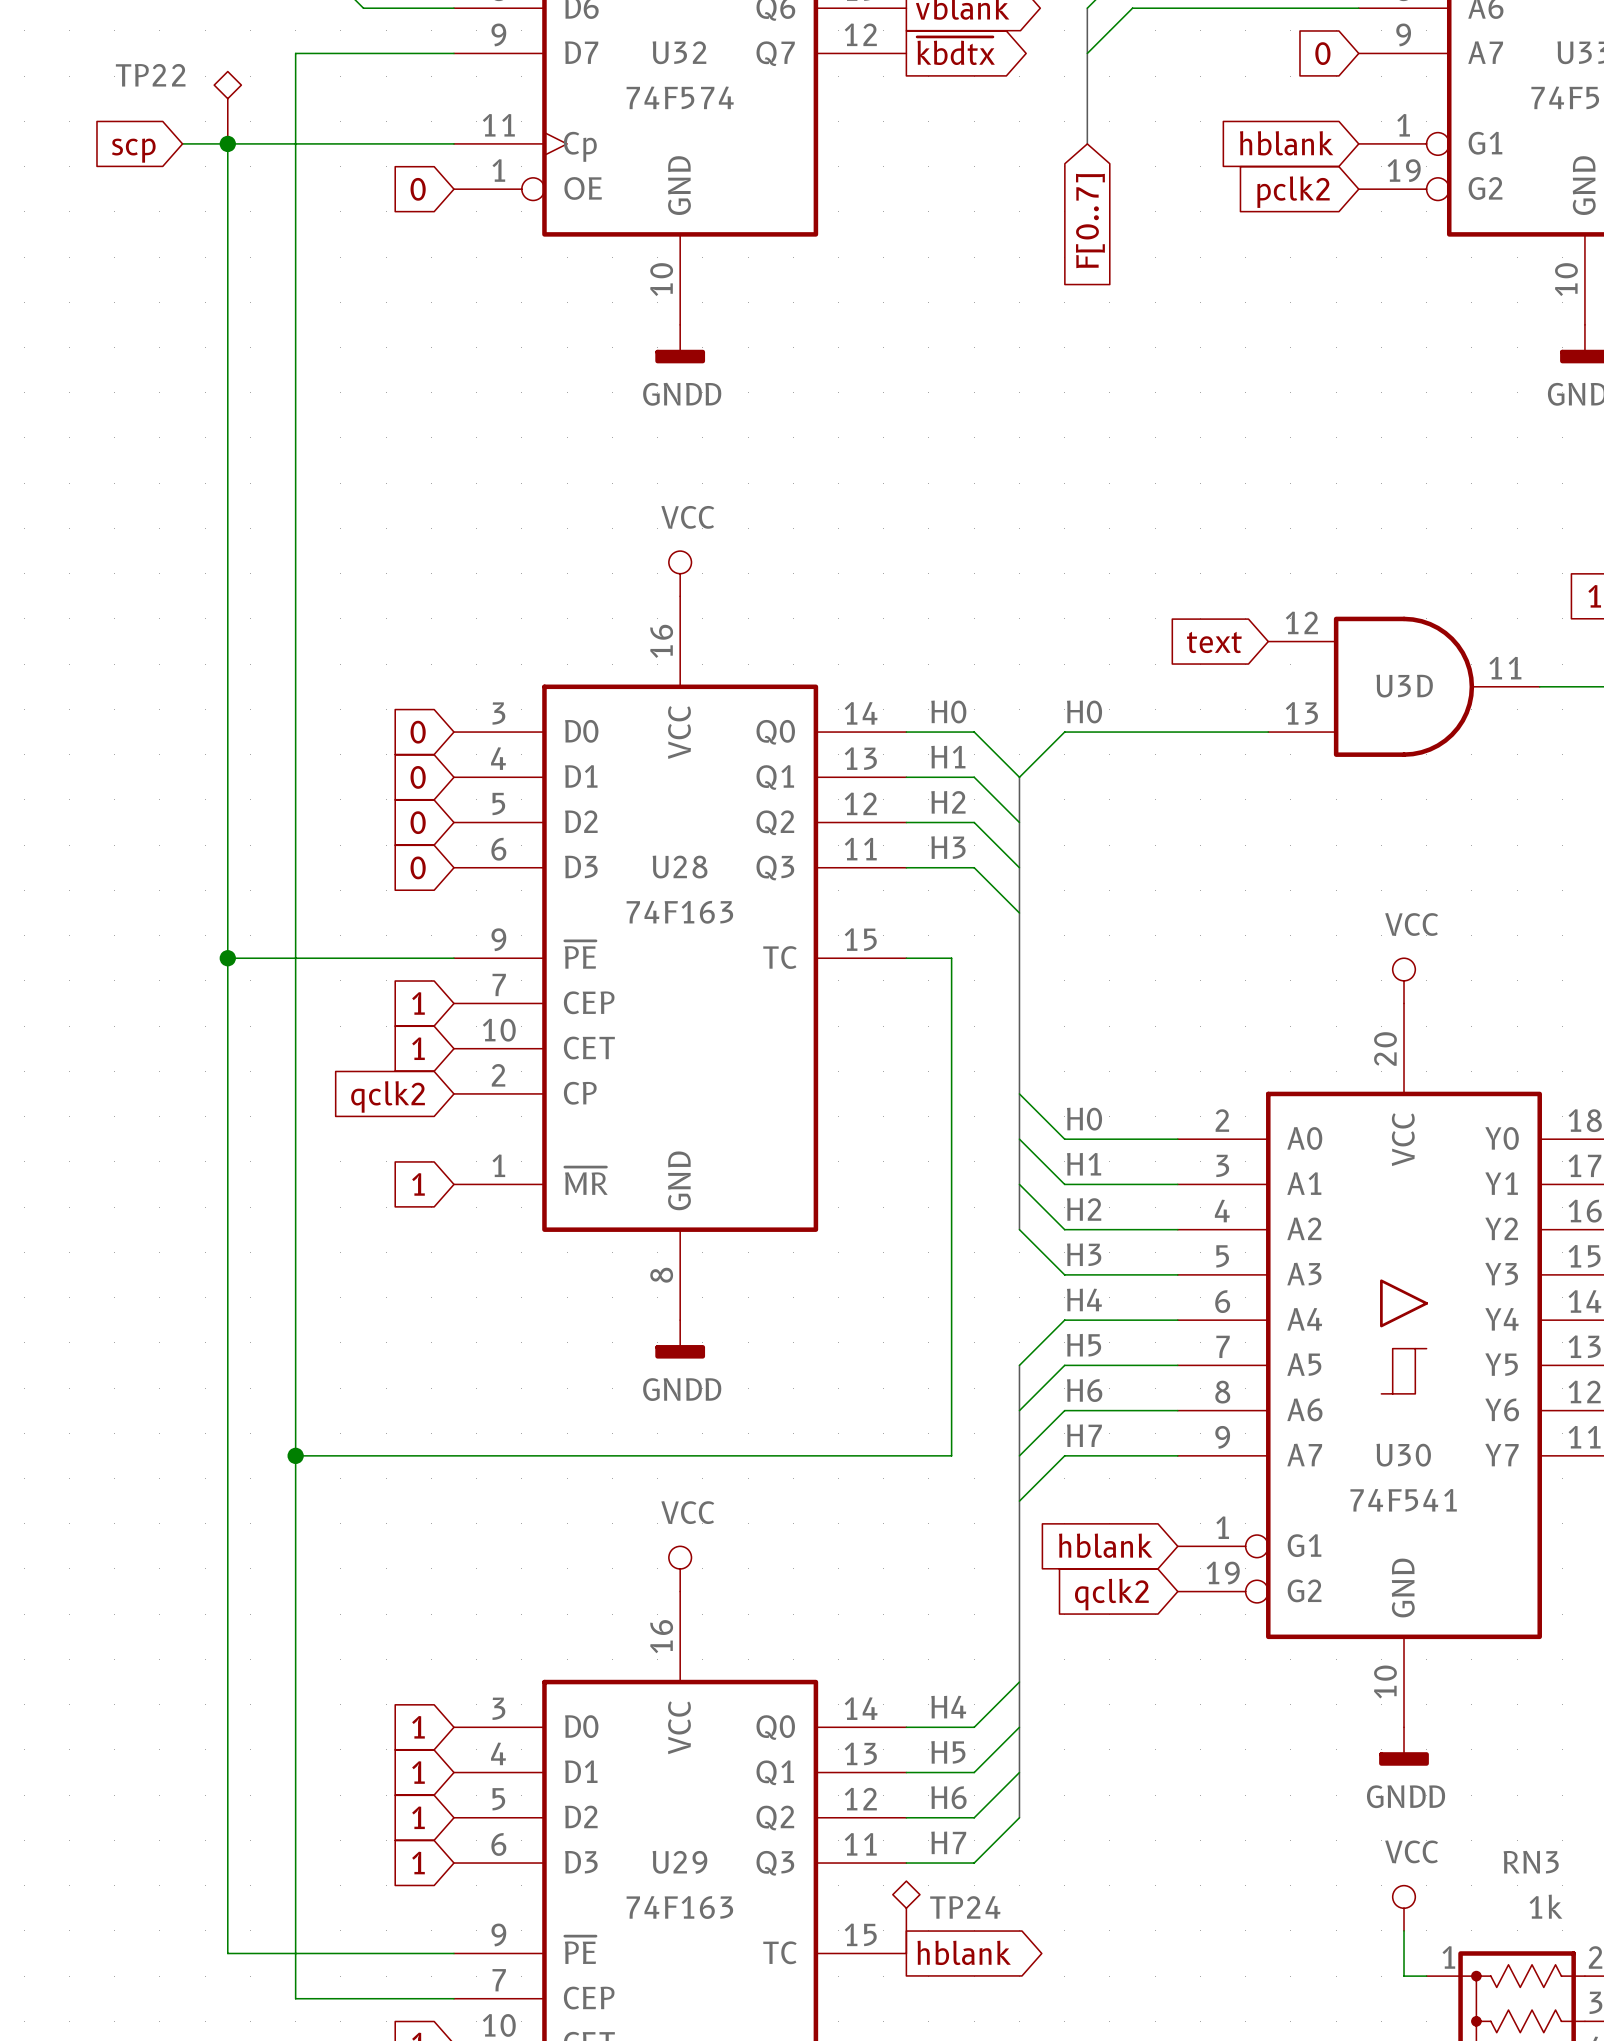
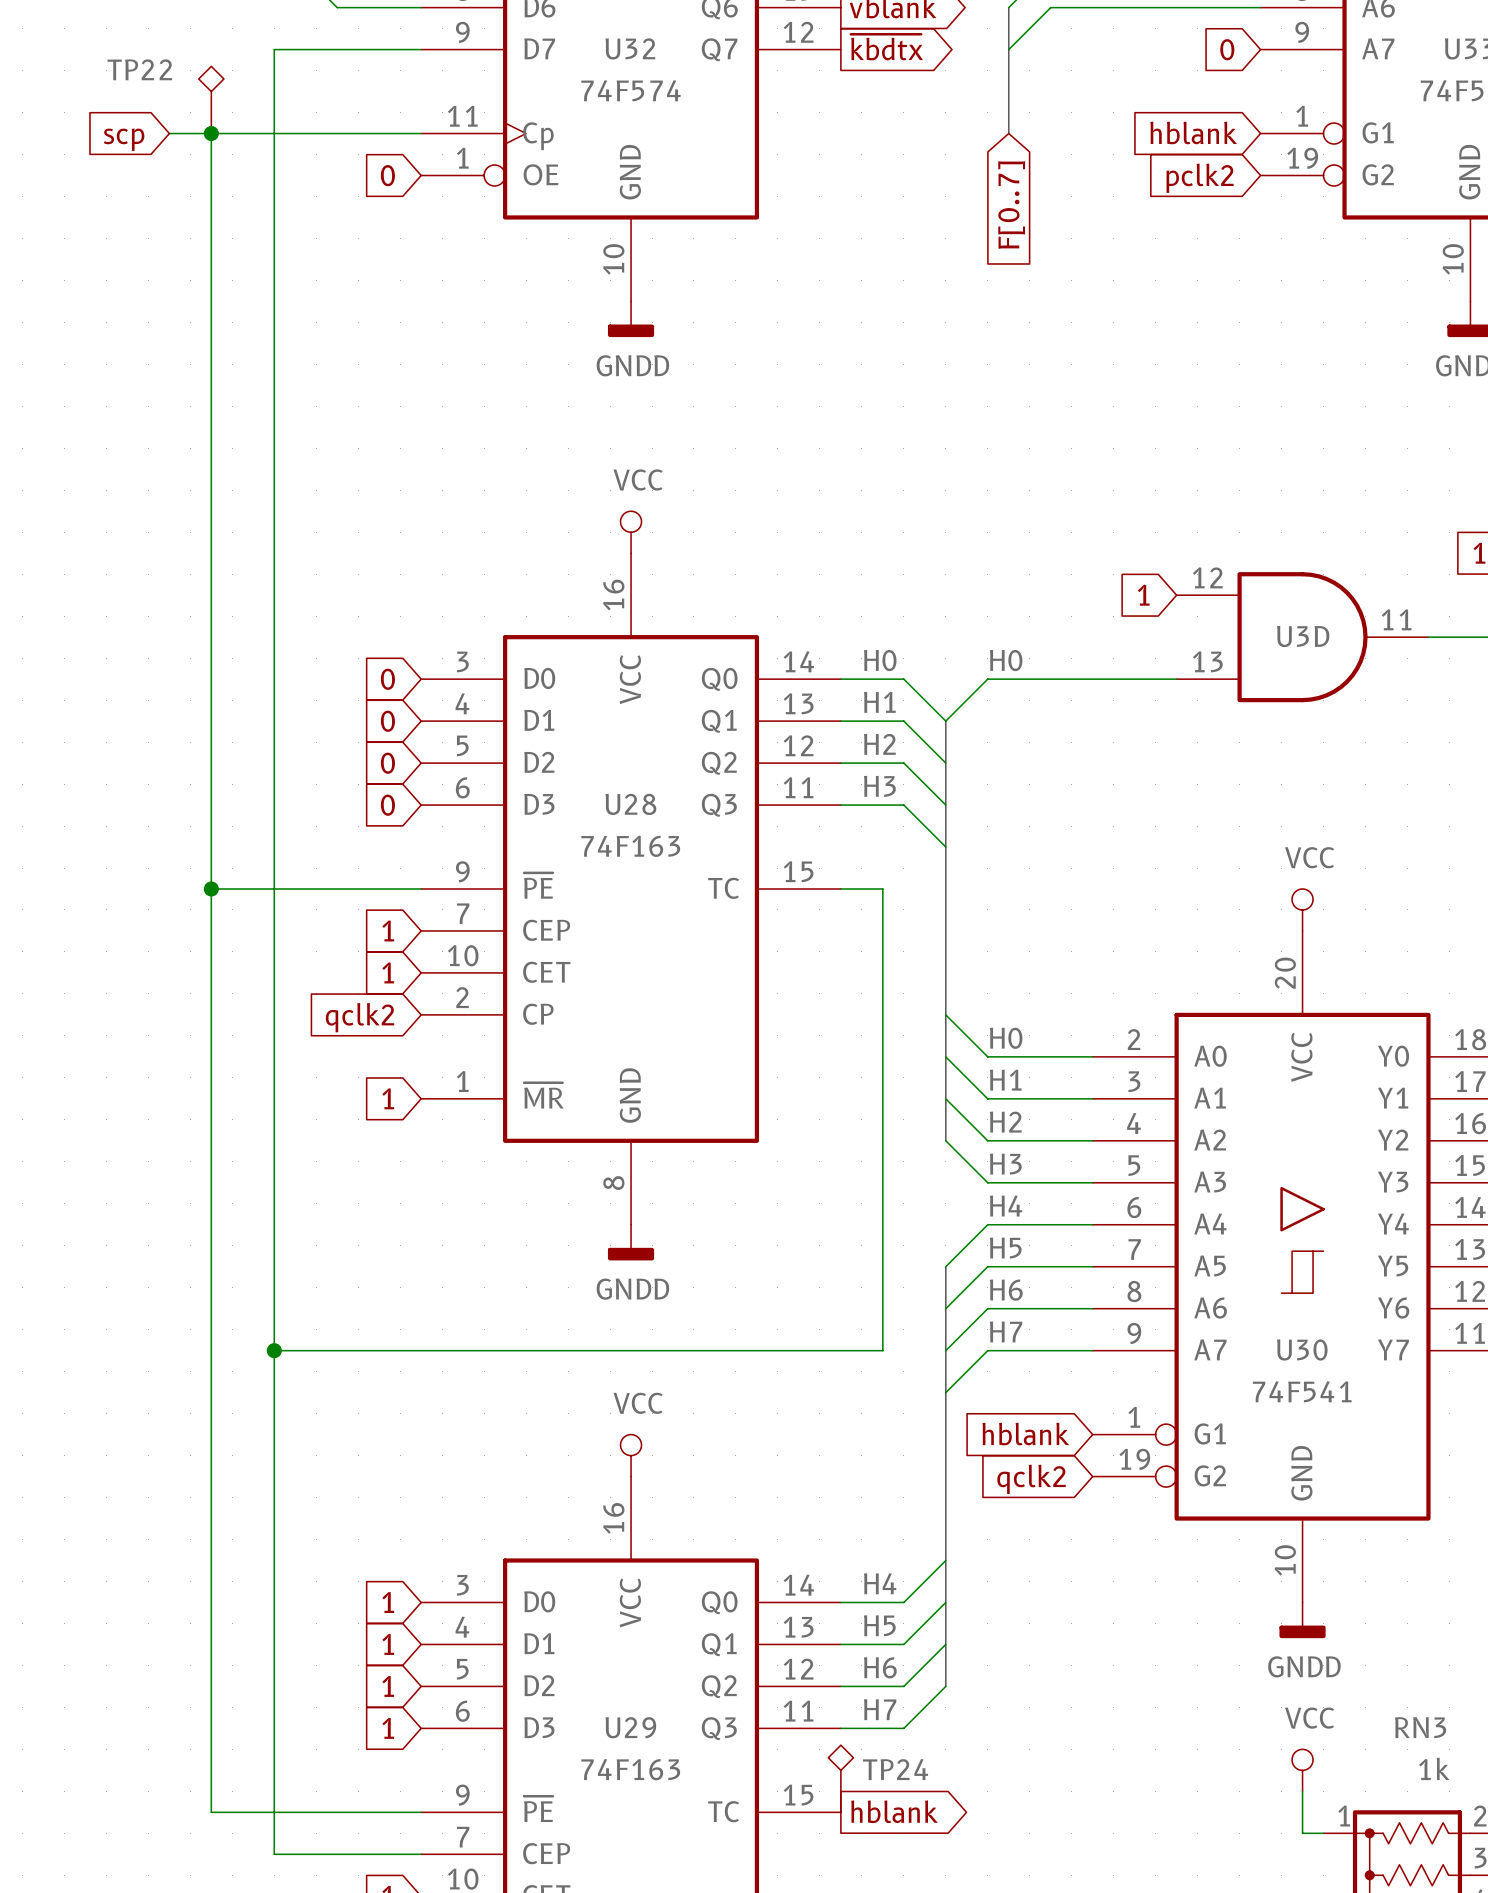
global label: text (1214, 642) -> 1 (1143, 595)

